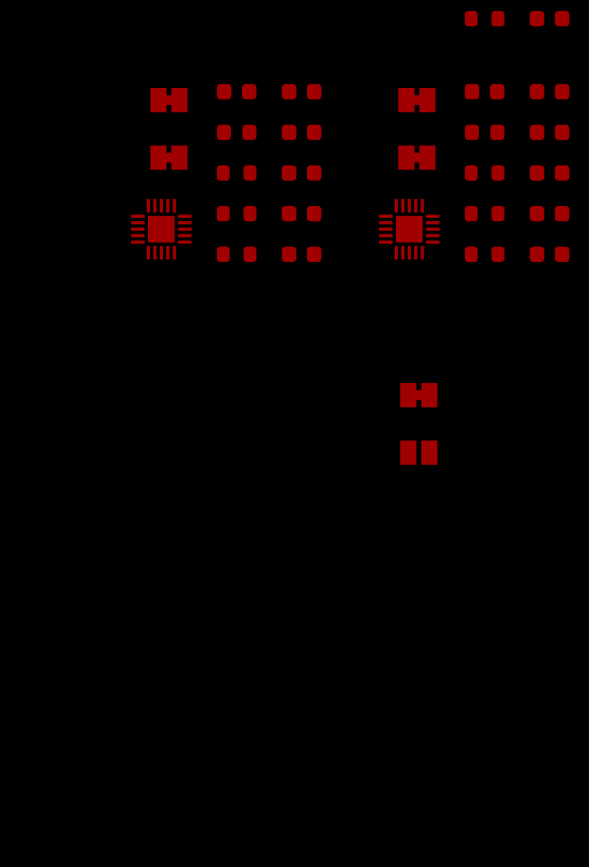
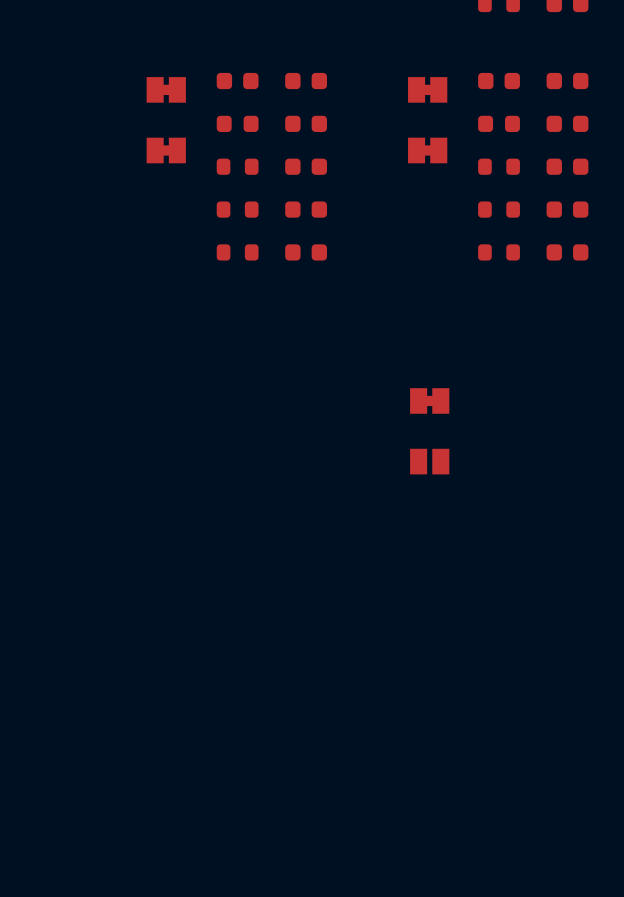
part: (161, 229) -> none
part: (409, 229) -> none

